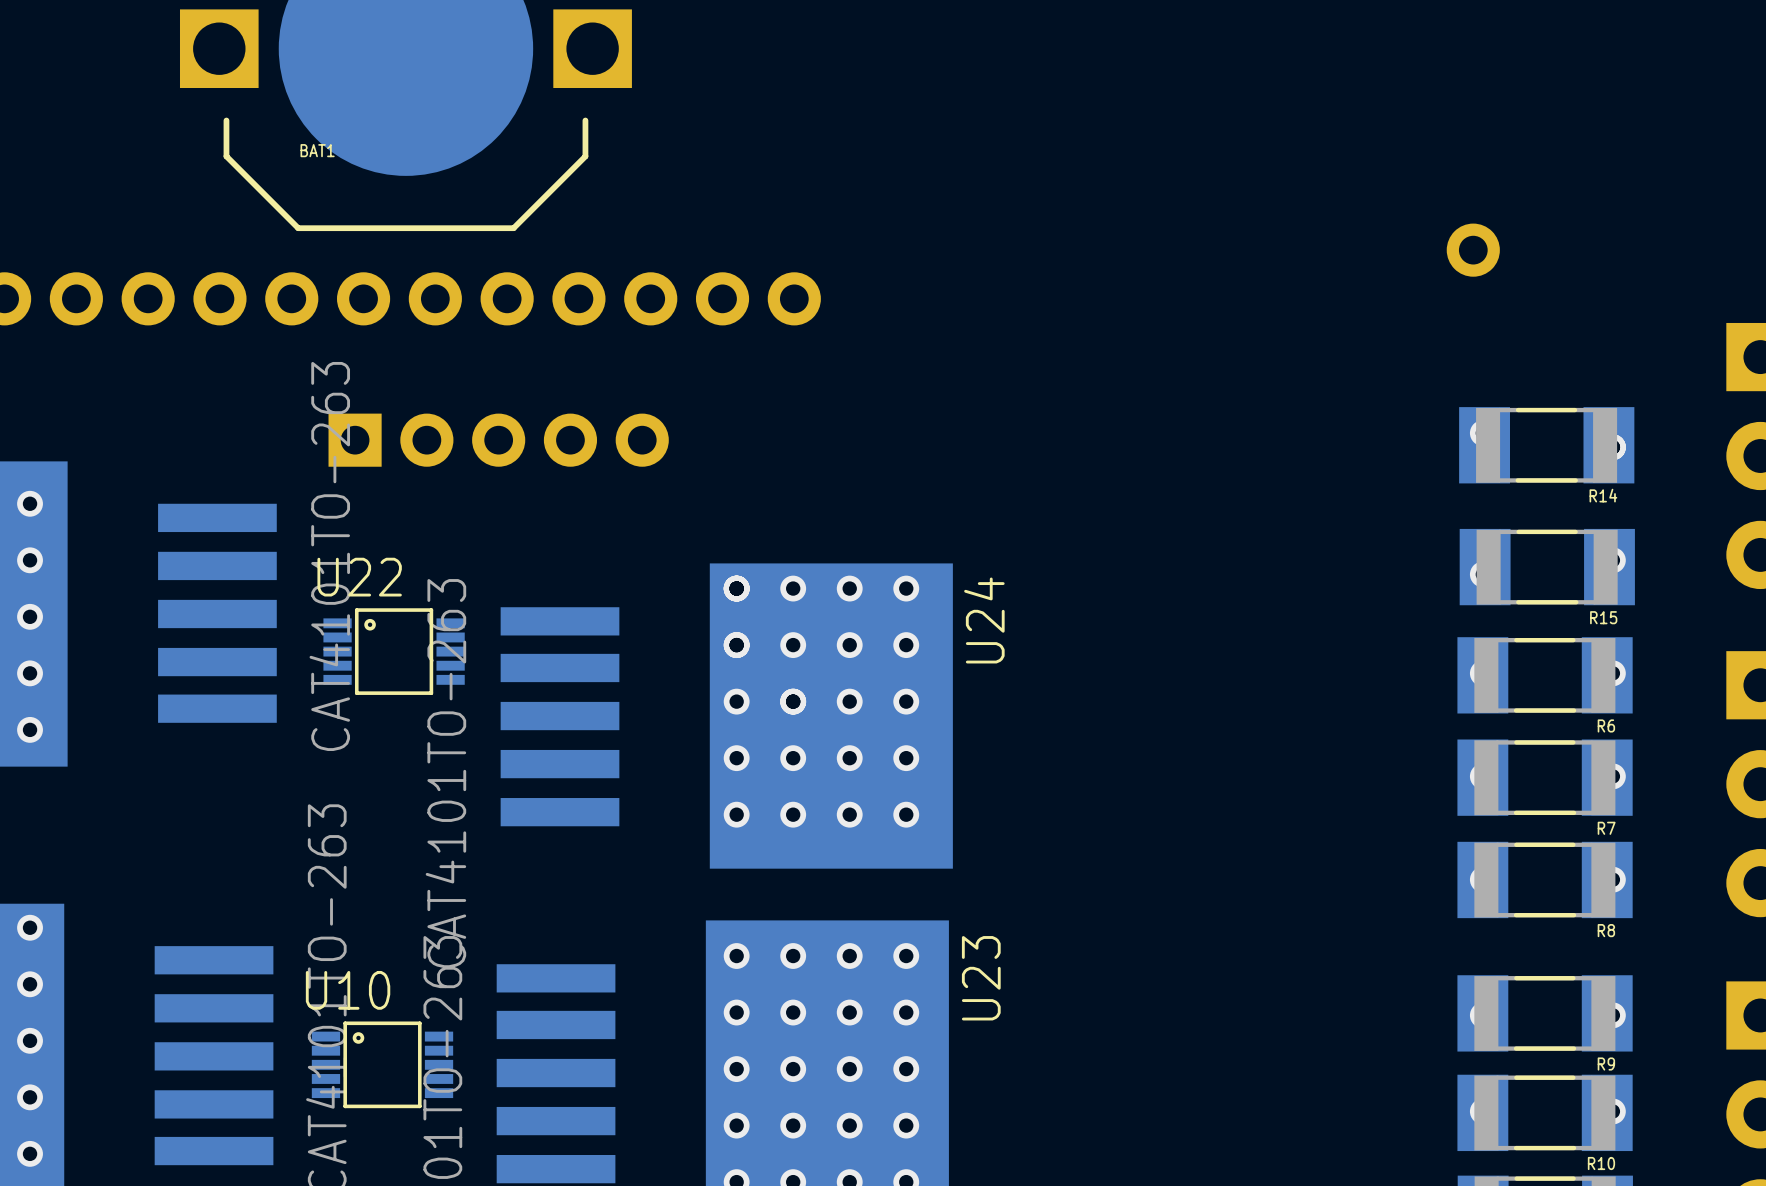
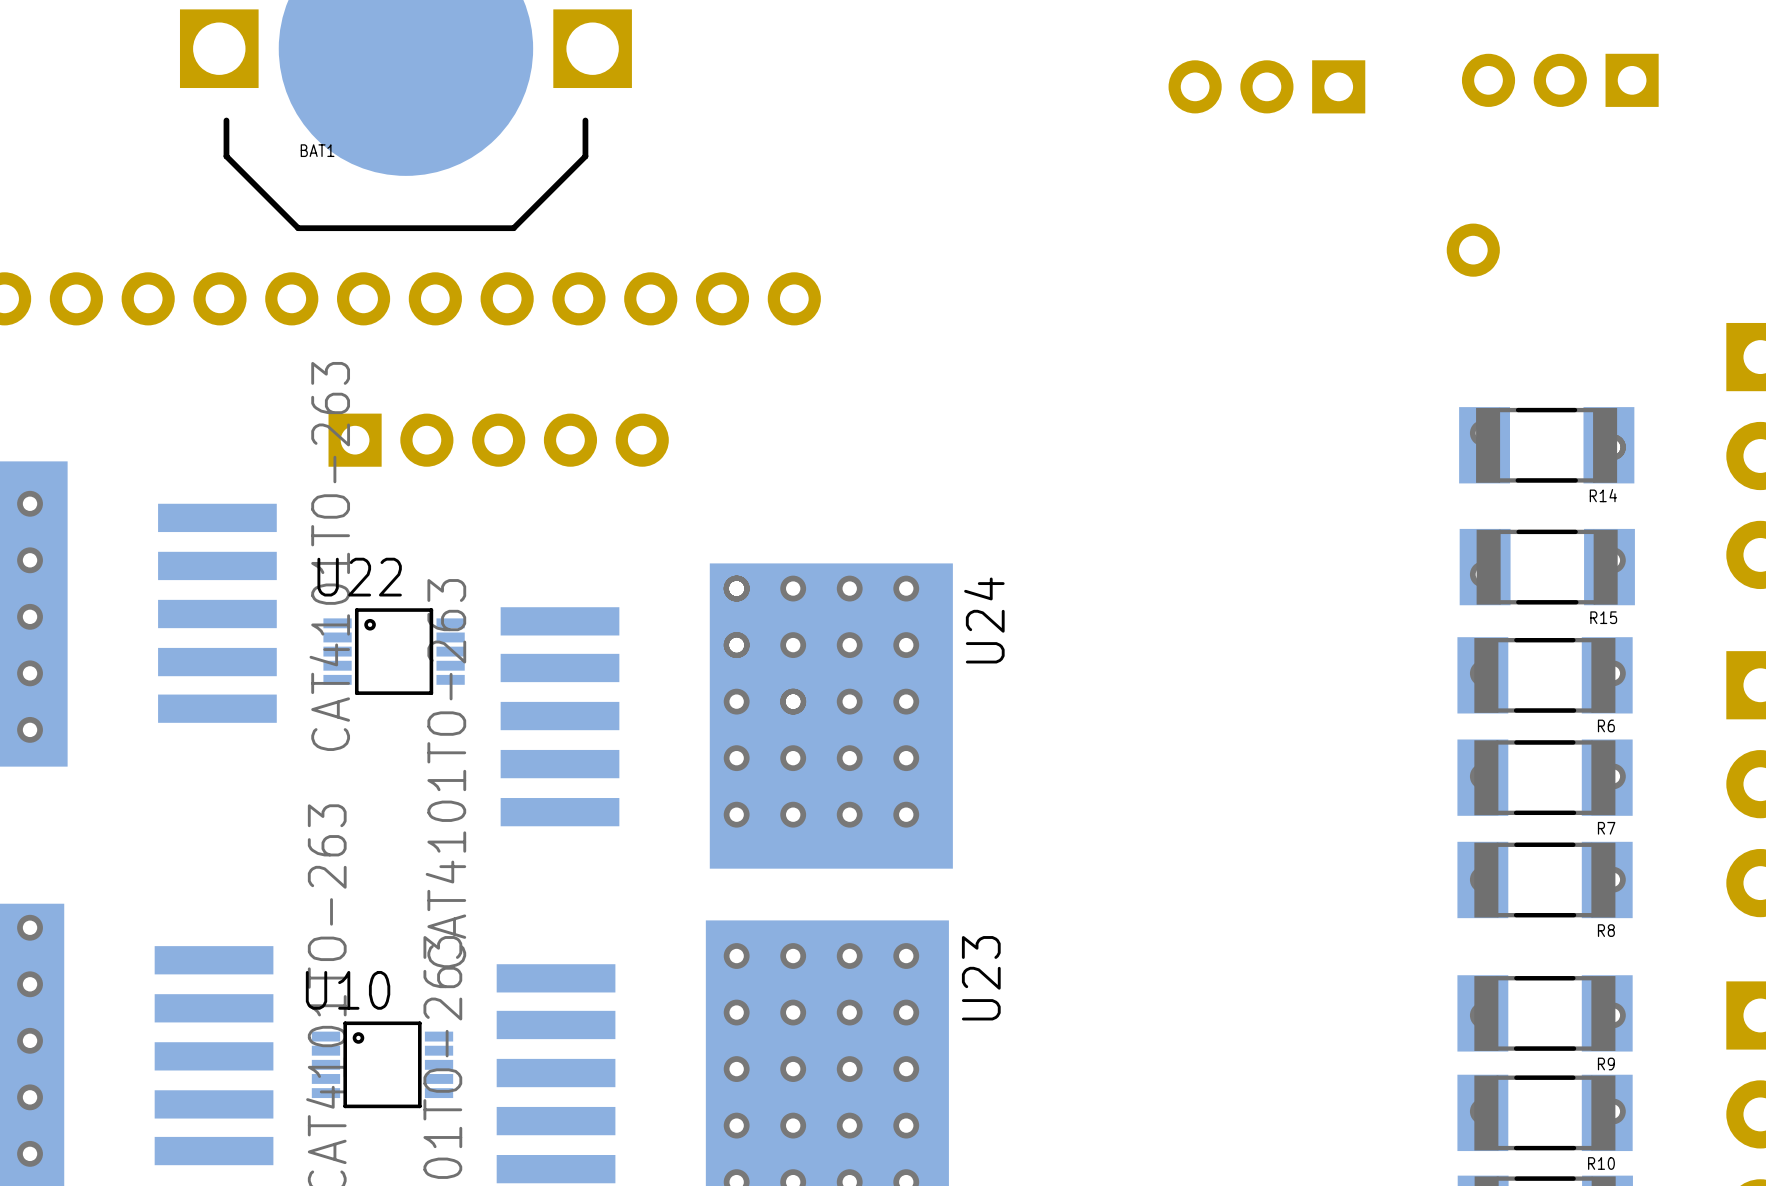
part: none -> (1560, 80)
part: none -> (1266, 86)

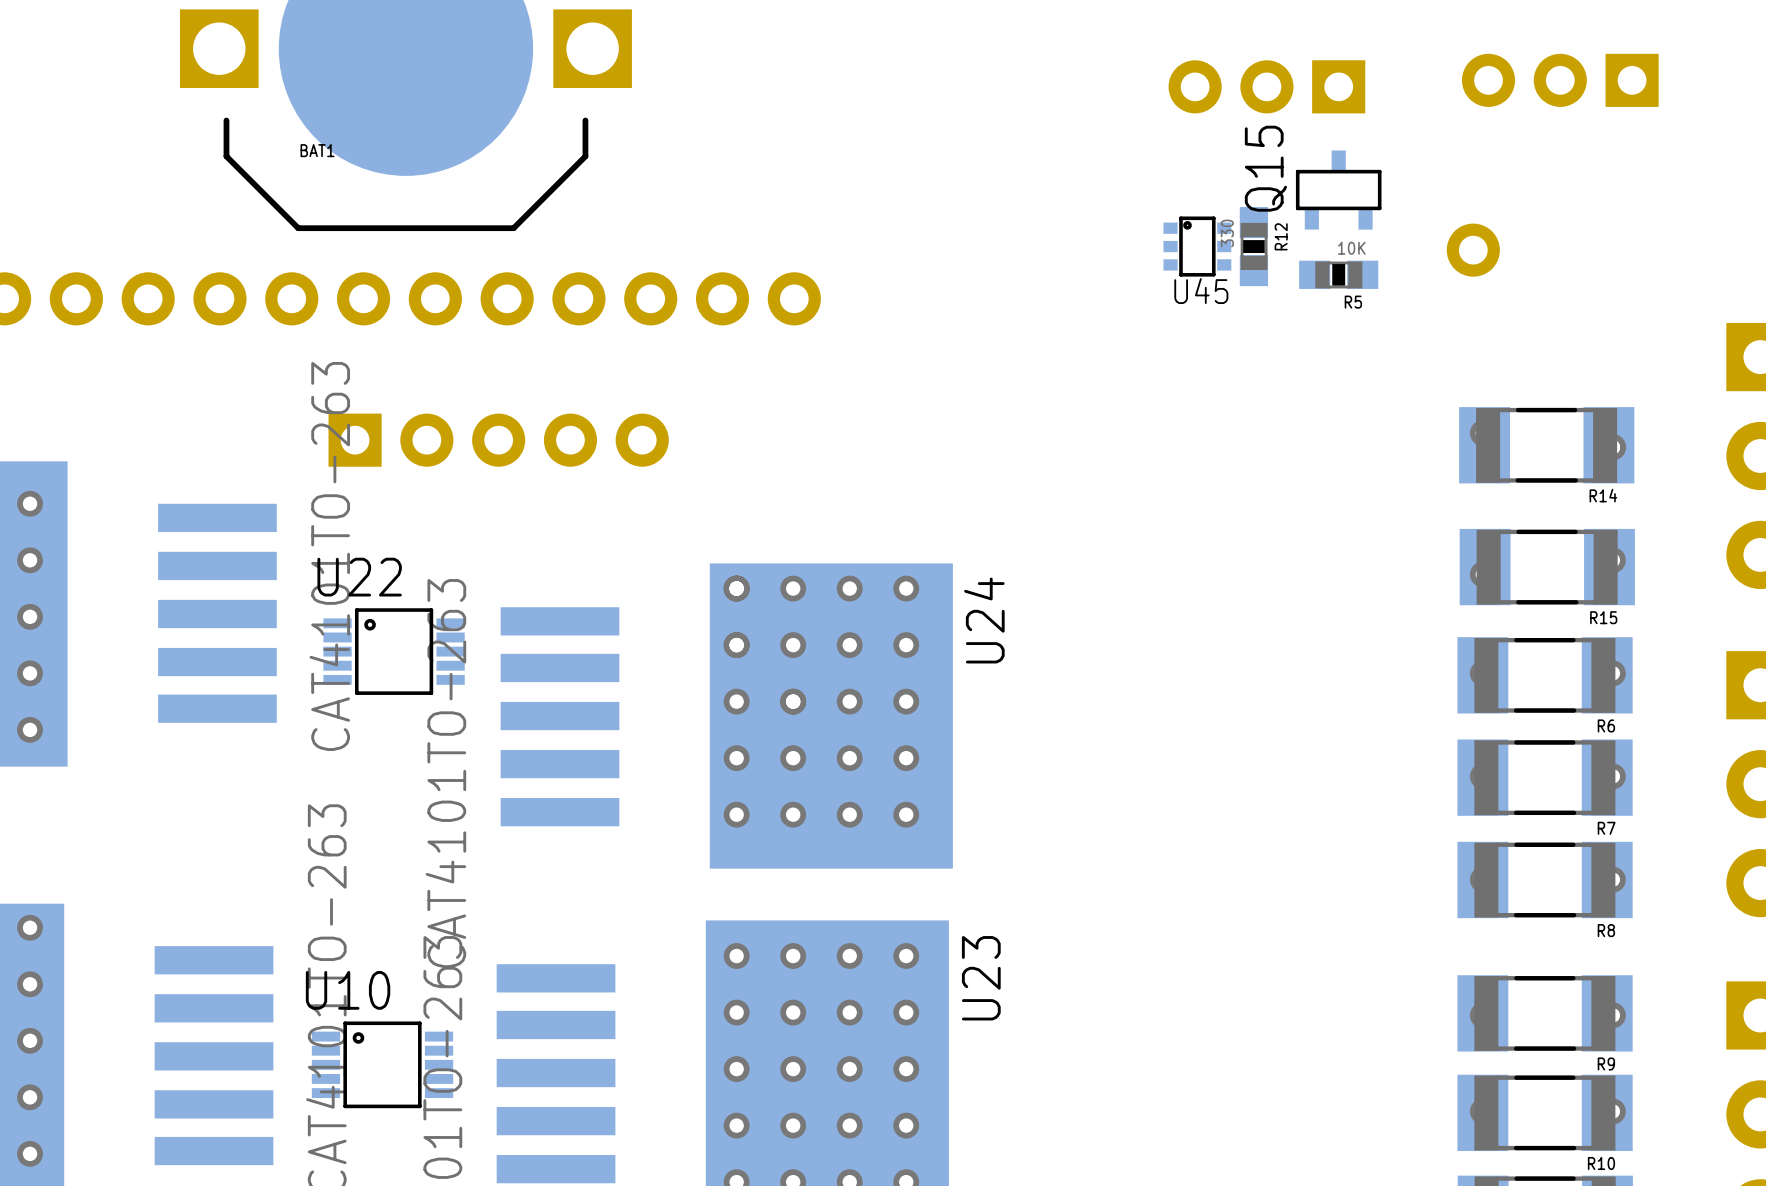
Q15: none -> (1338, 190)
U45: none -> (1197, 246)
R12: none -> 330 (1253, 246)
R5: none -> 10K (1338, 274)

